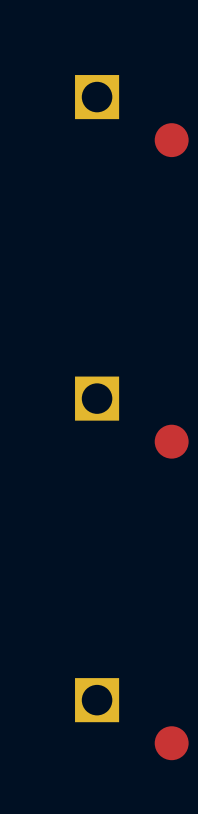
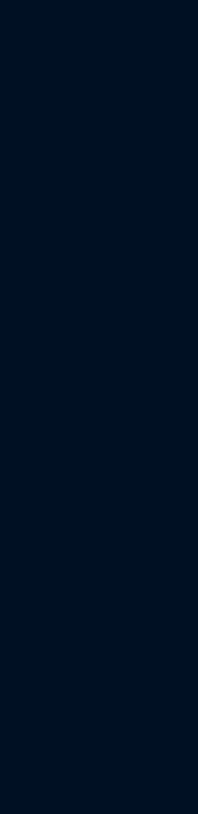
part: (131, 116) -> none
part: (131, 417) -> none
part: (131, 719) -> none

